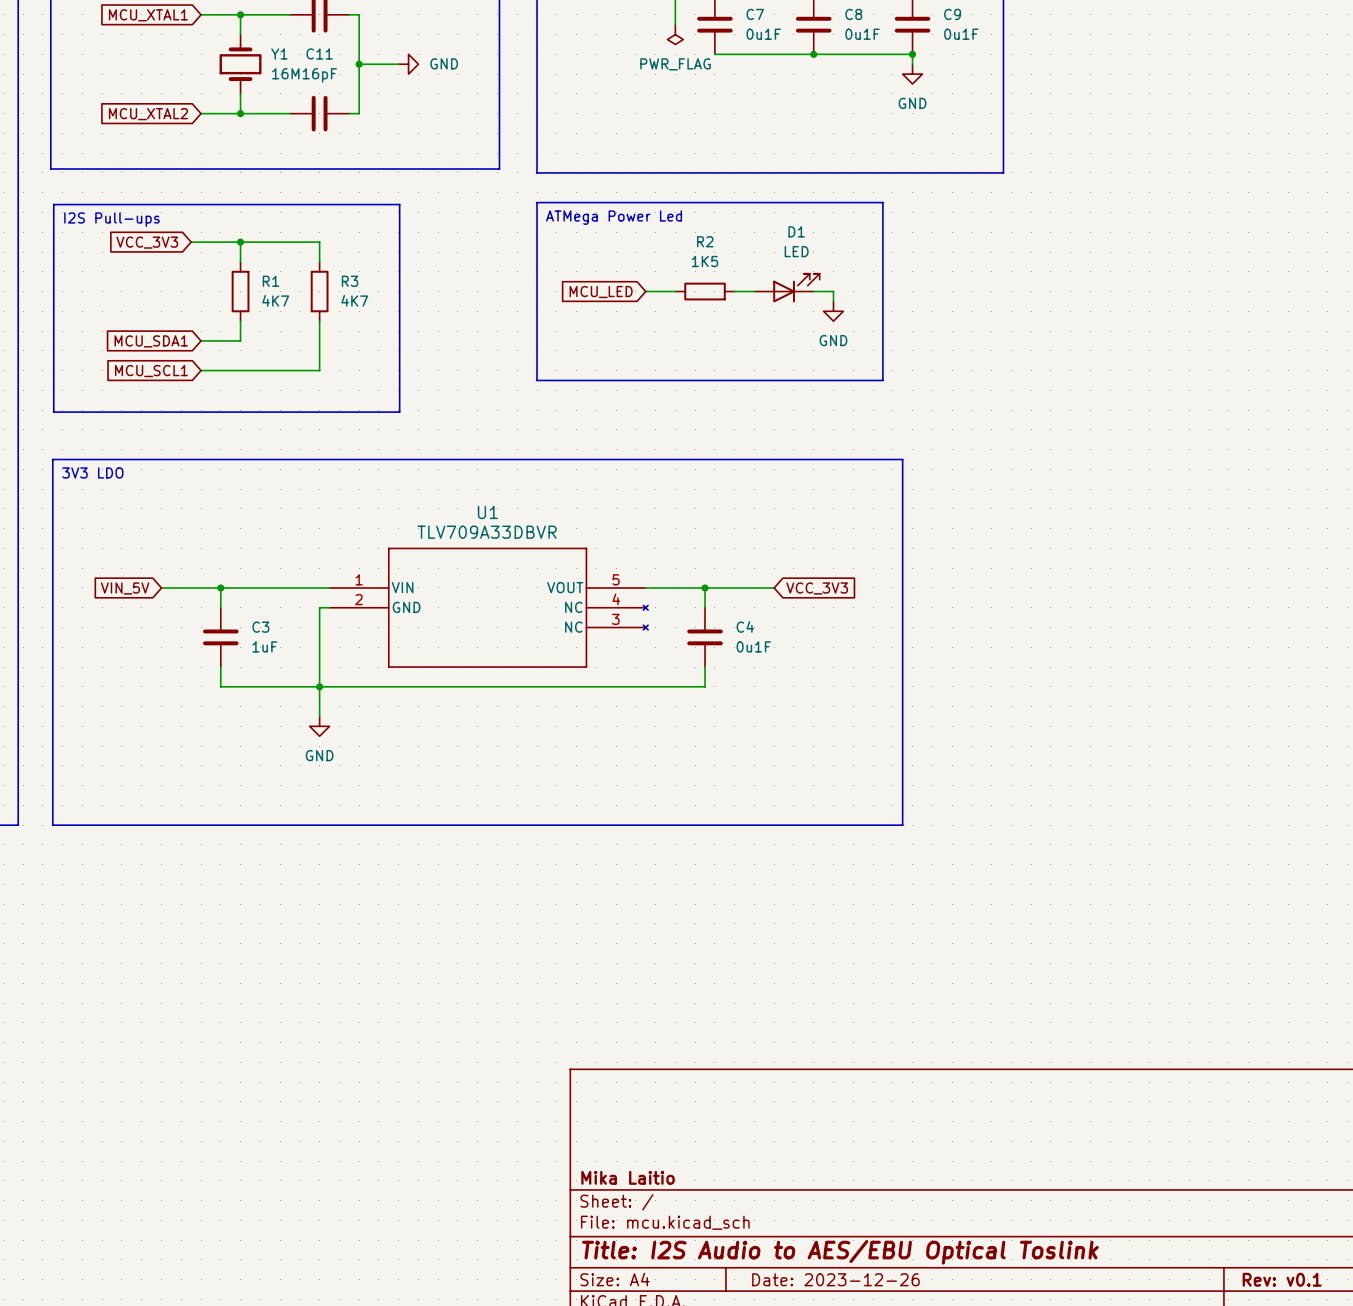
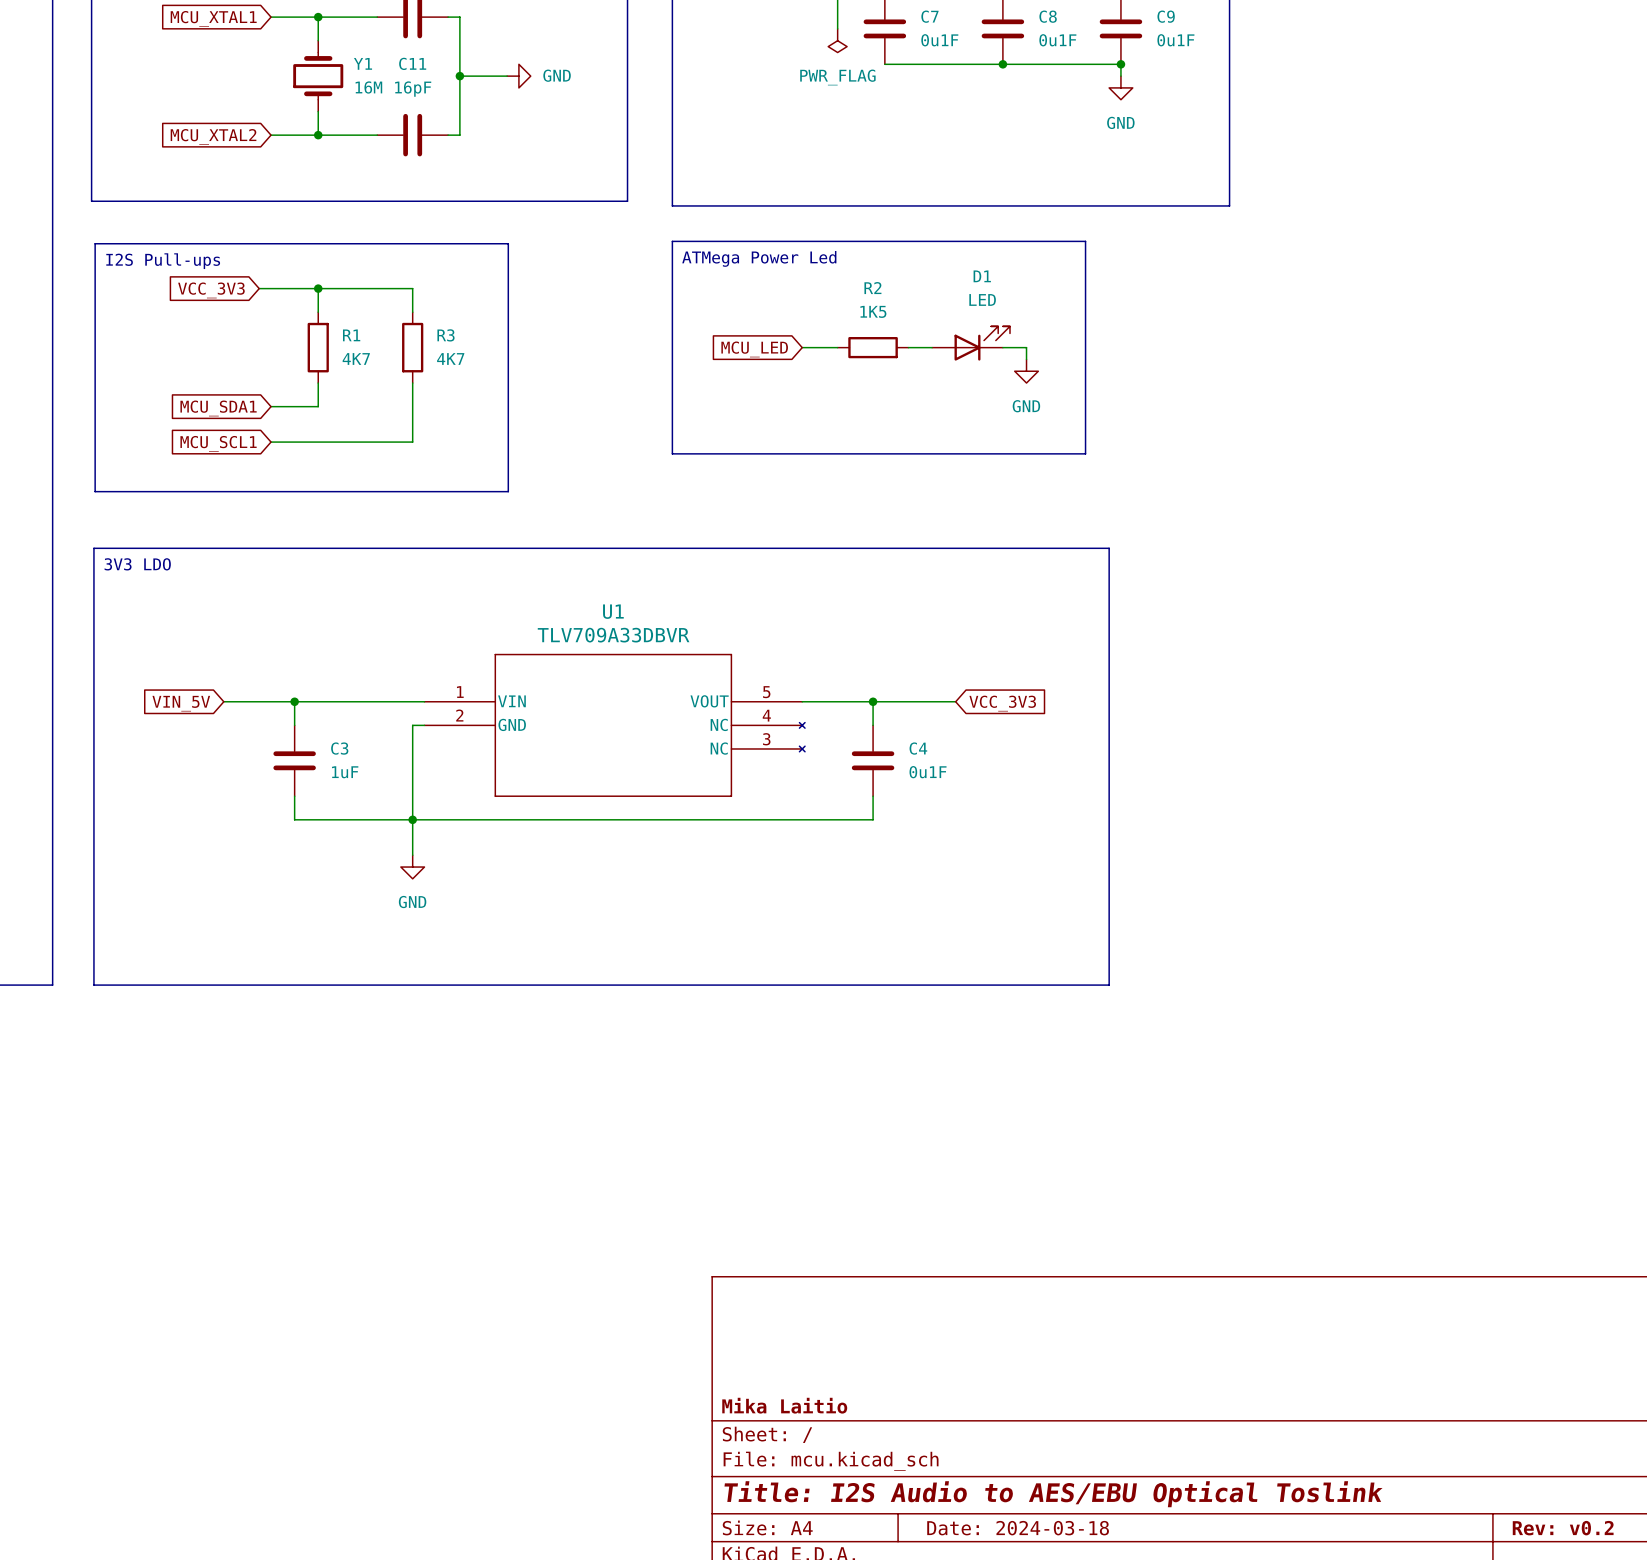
title block: Date: 2023-12-26 (835, 1279) -> Date: 2024-03-18 (1018, 1528)
title block: Rev: v0.1 (1282, 1279) -> Rev: v0.2 (1563, 1528)

